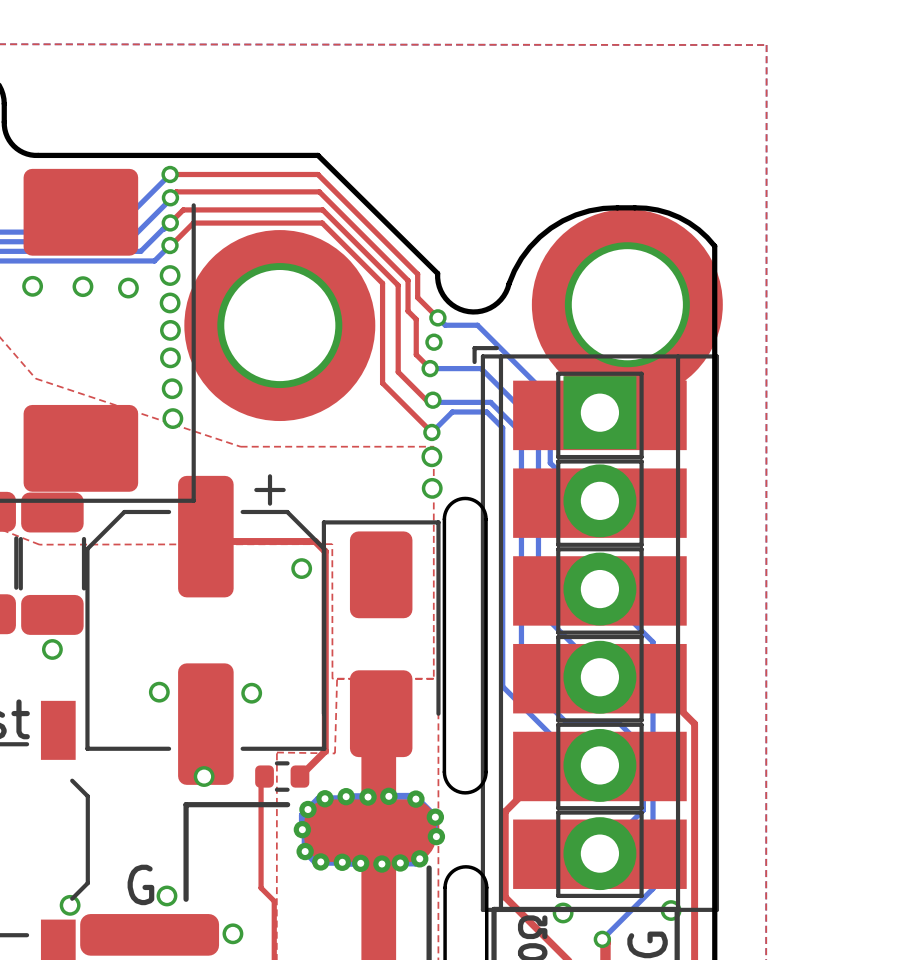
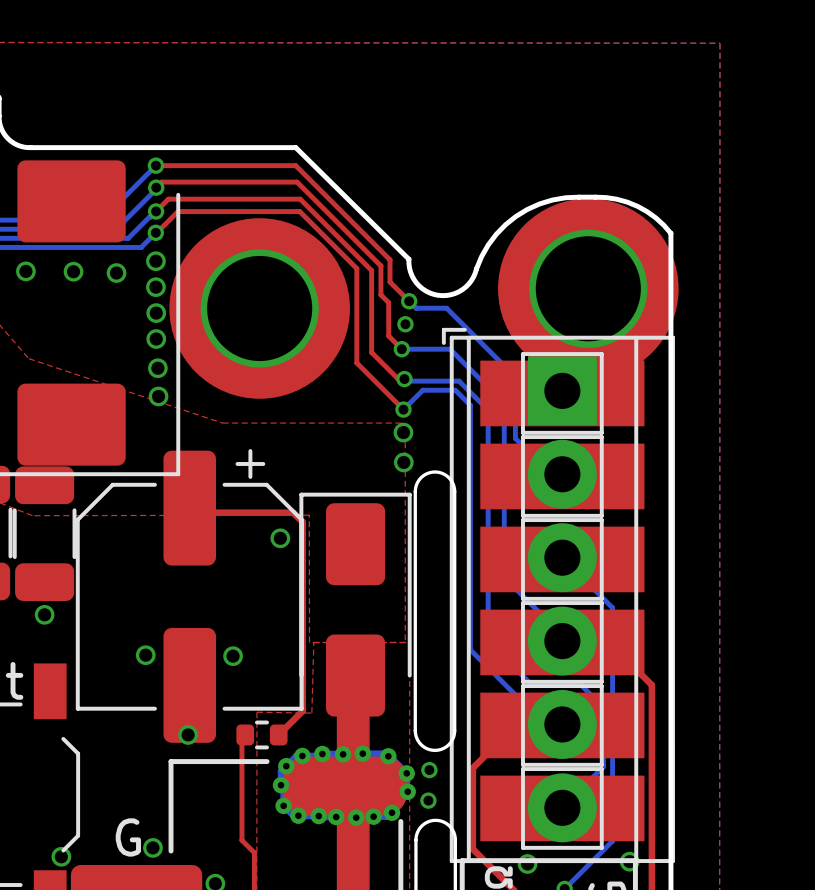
via: none -> (429, 770)
via: none -> (428, 800)

